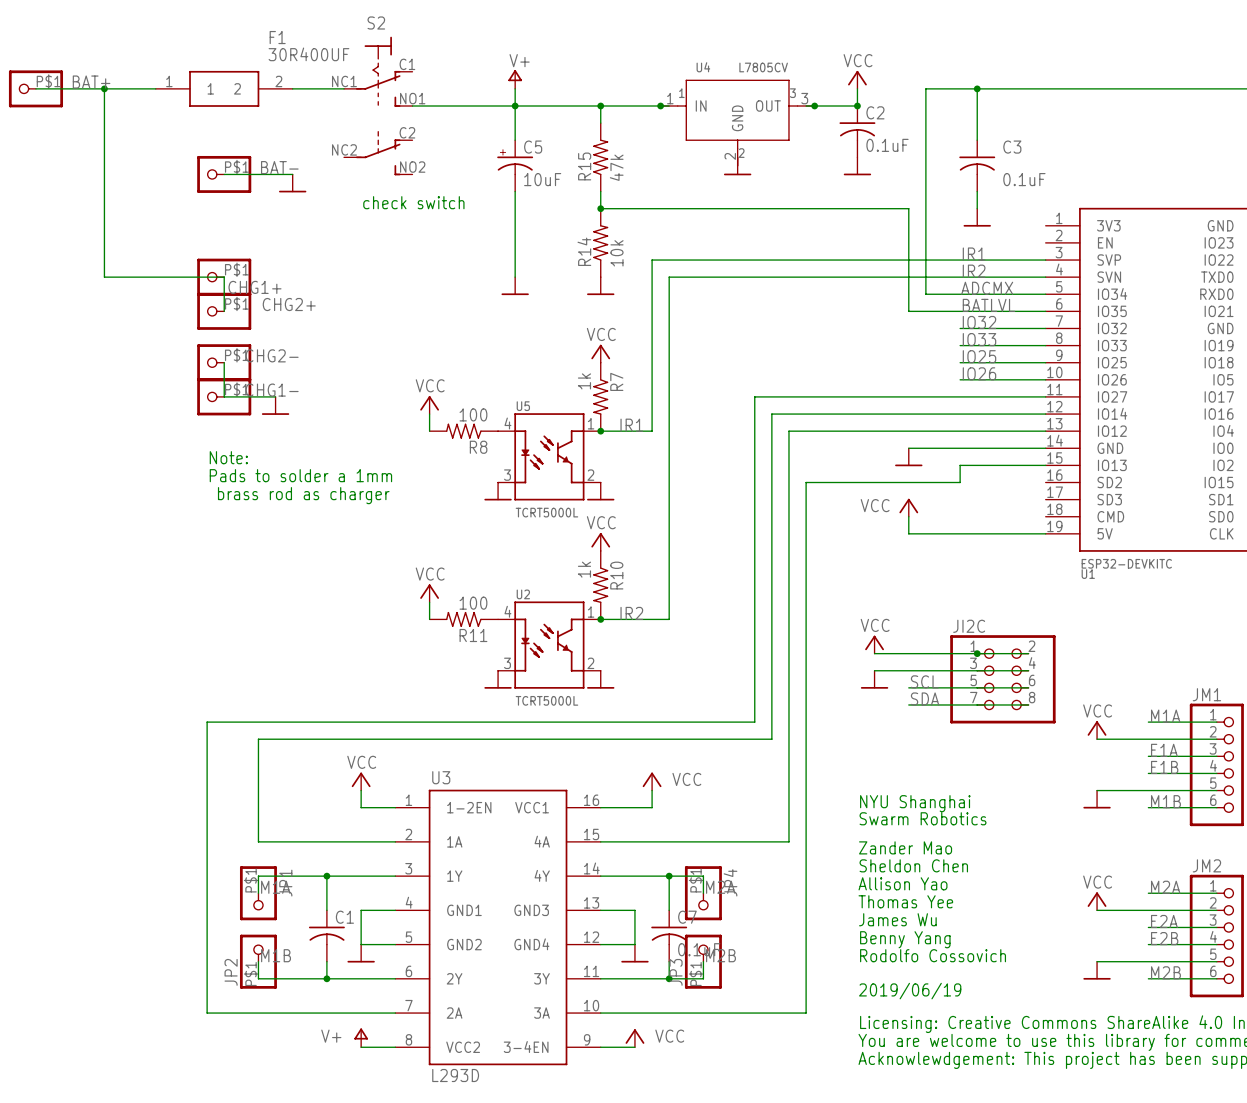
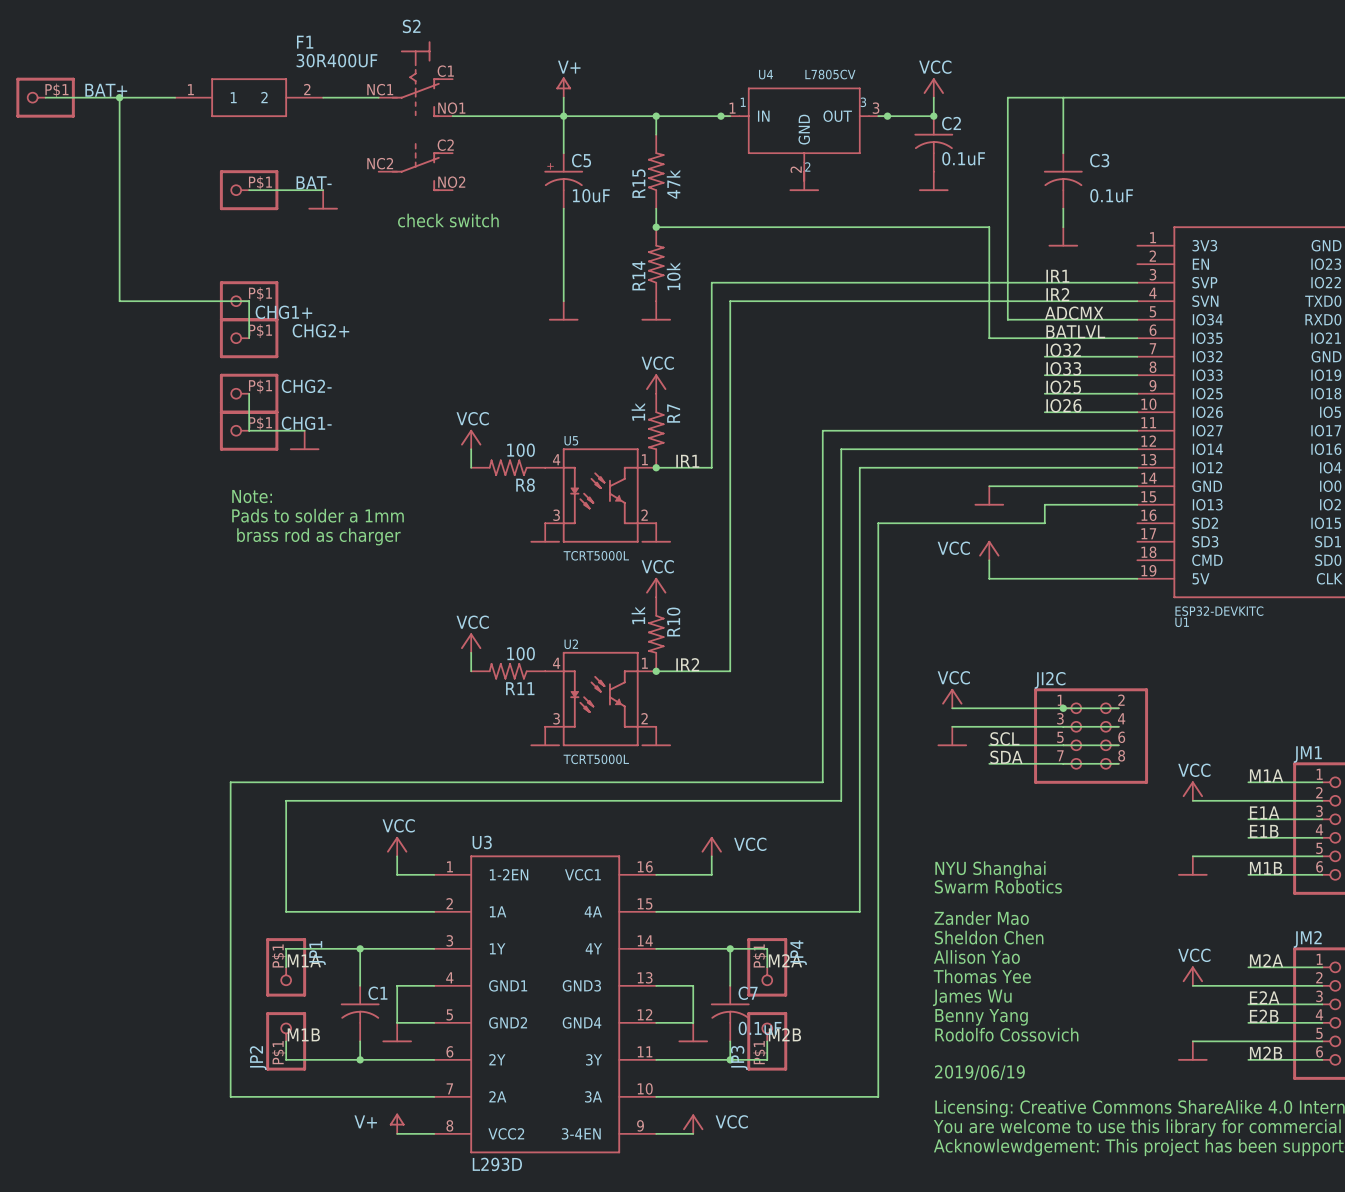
junction: (977, 88) -> none

